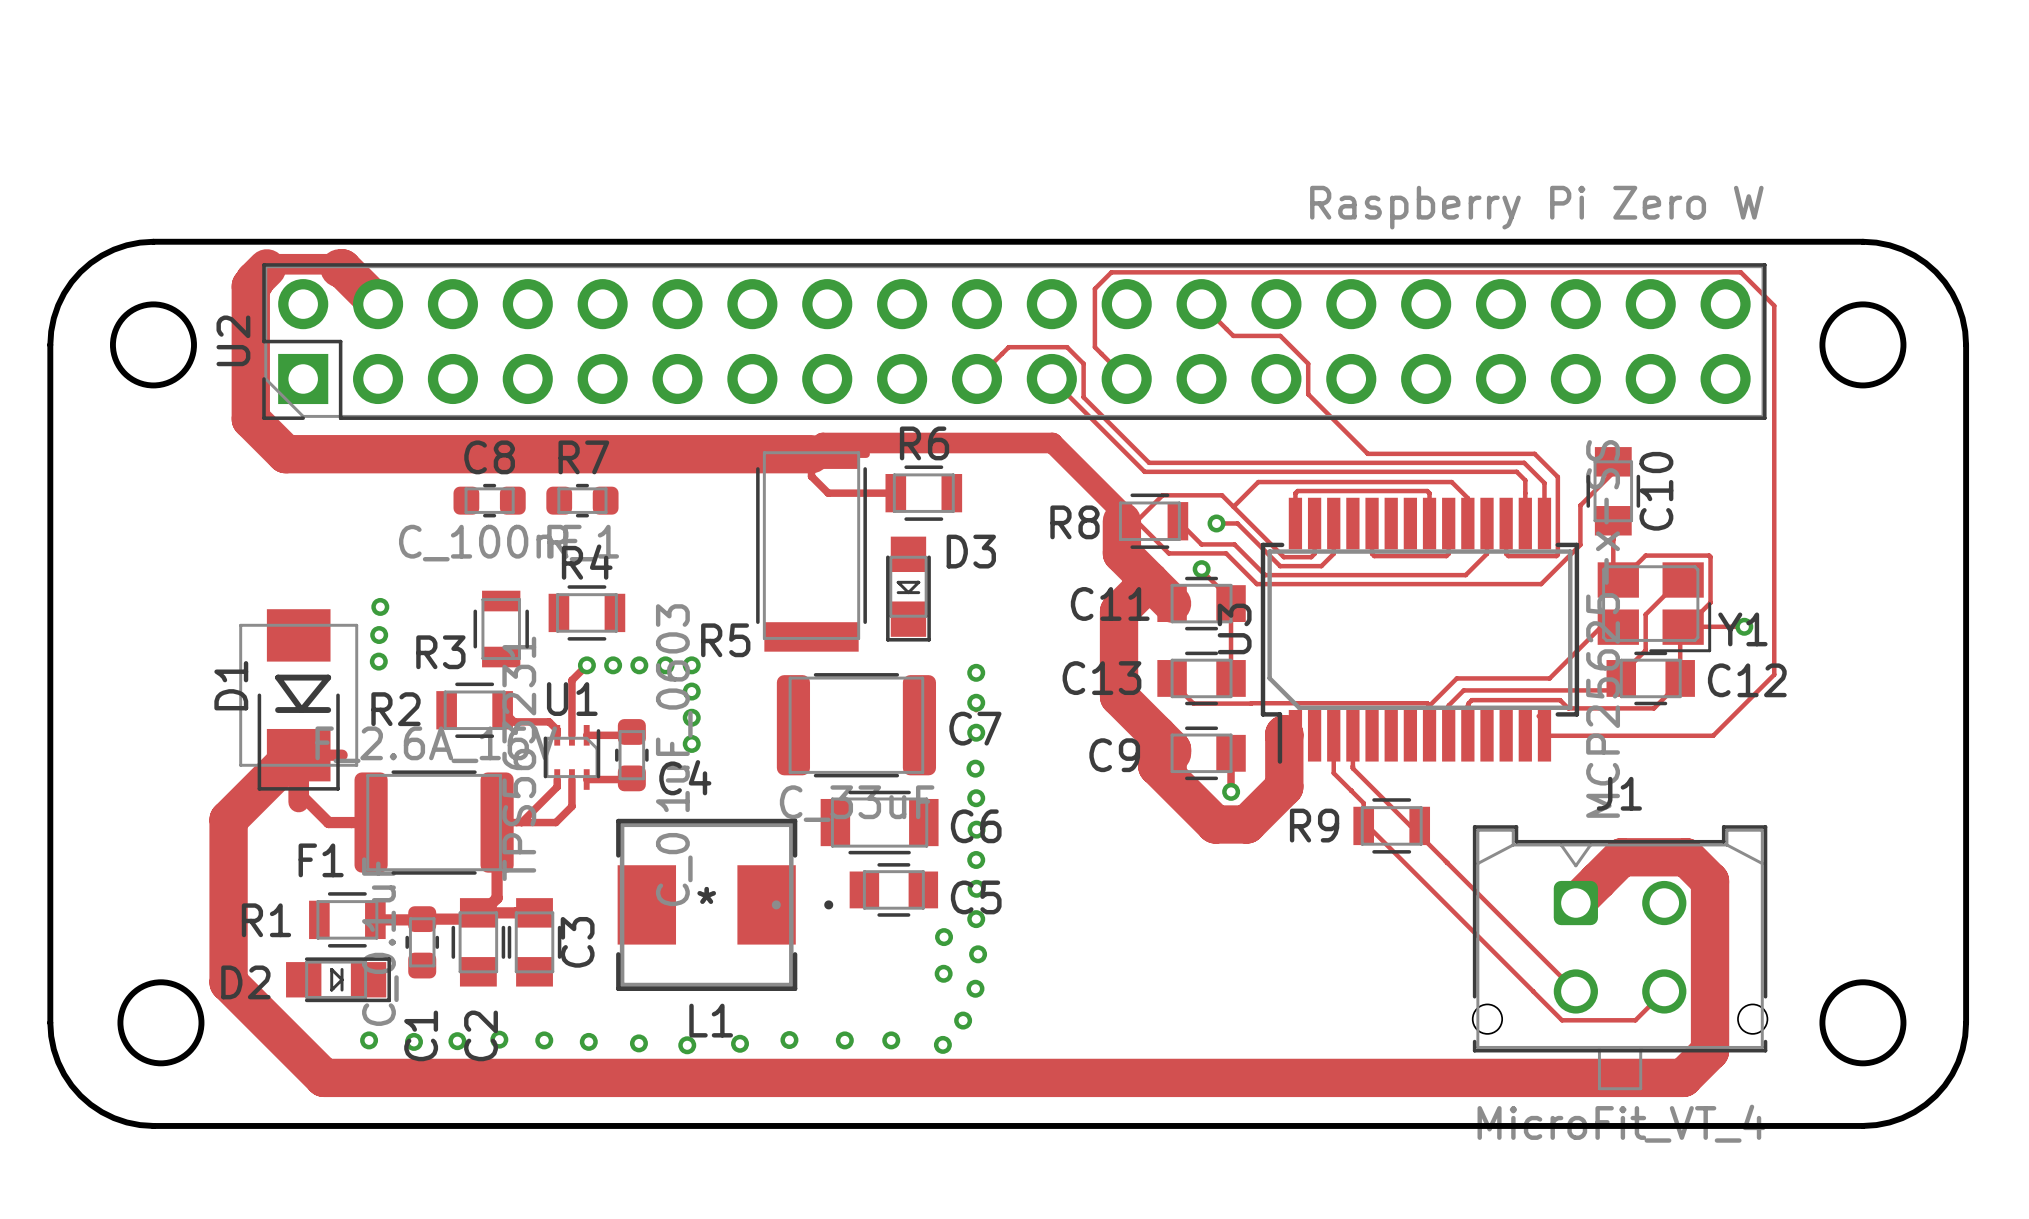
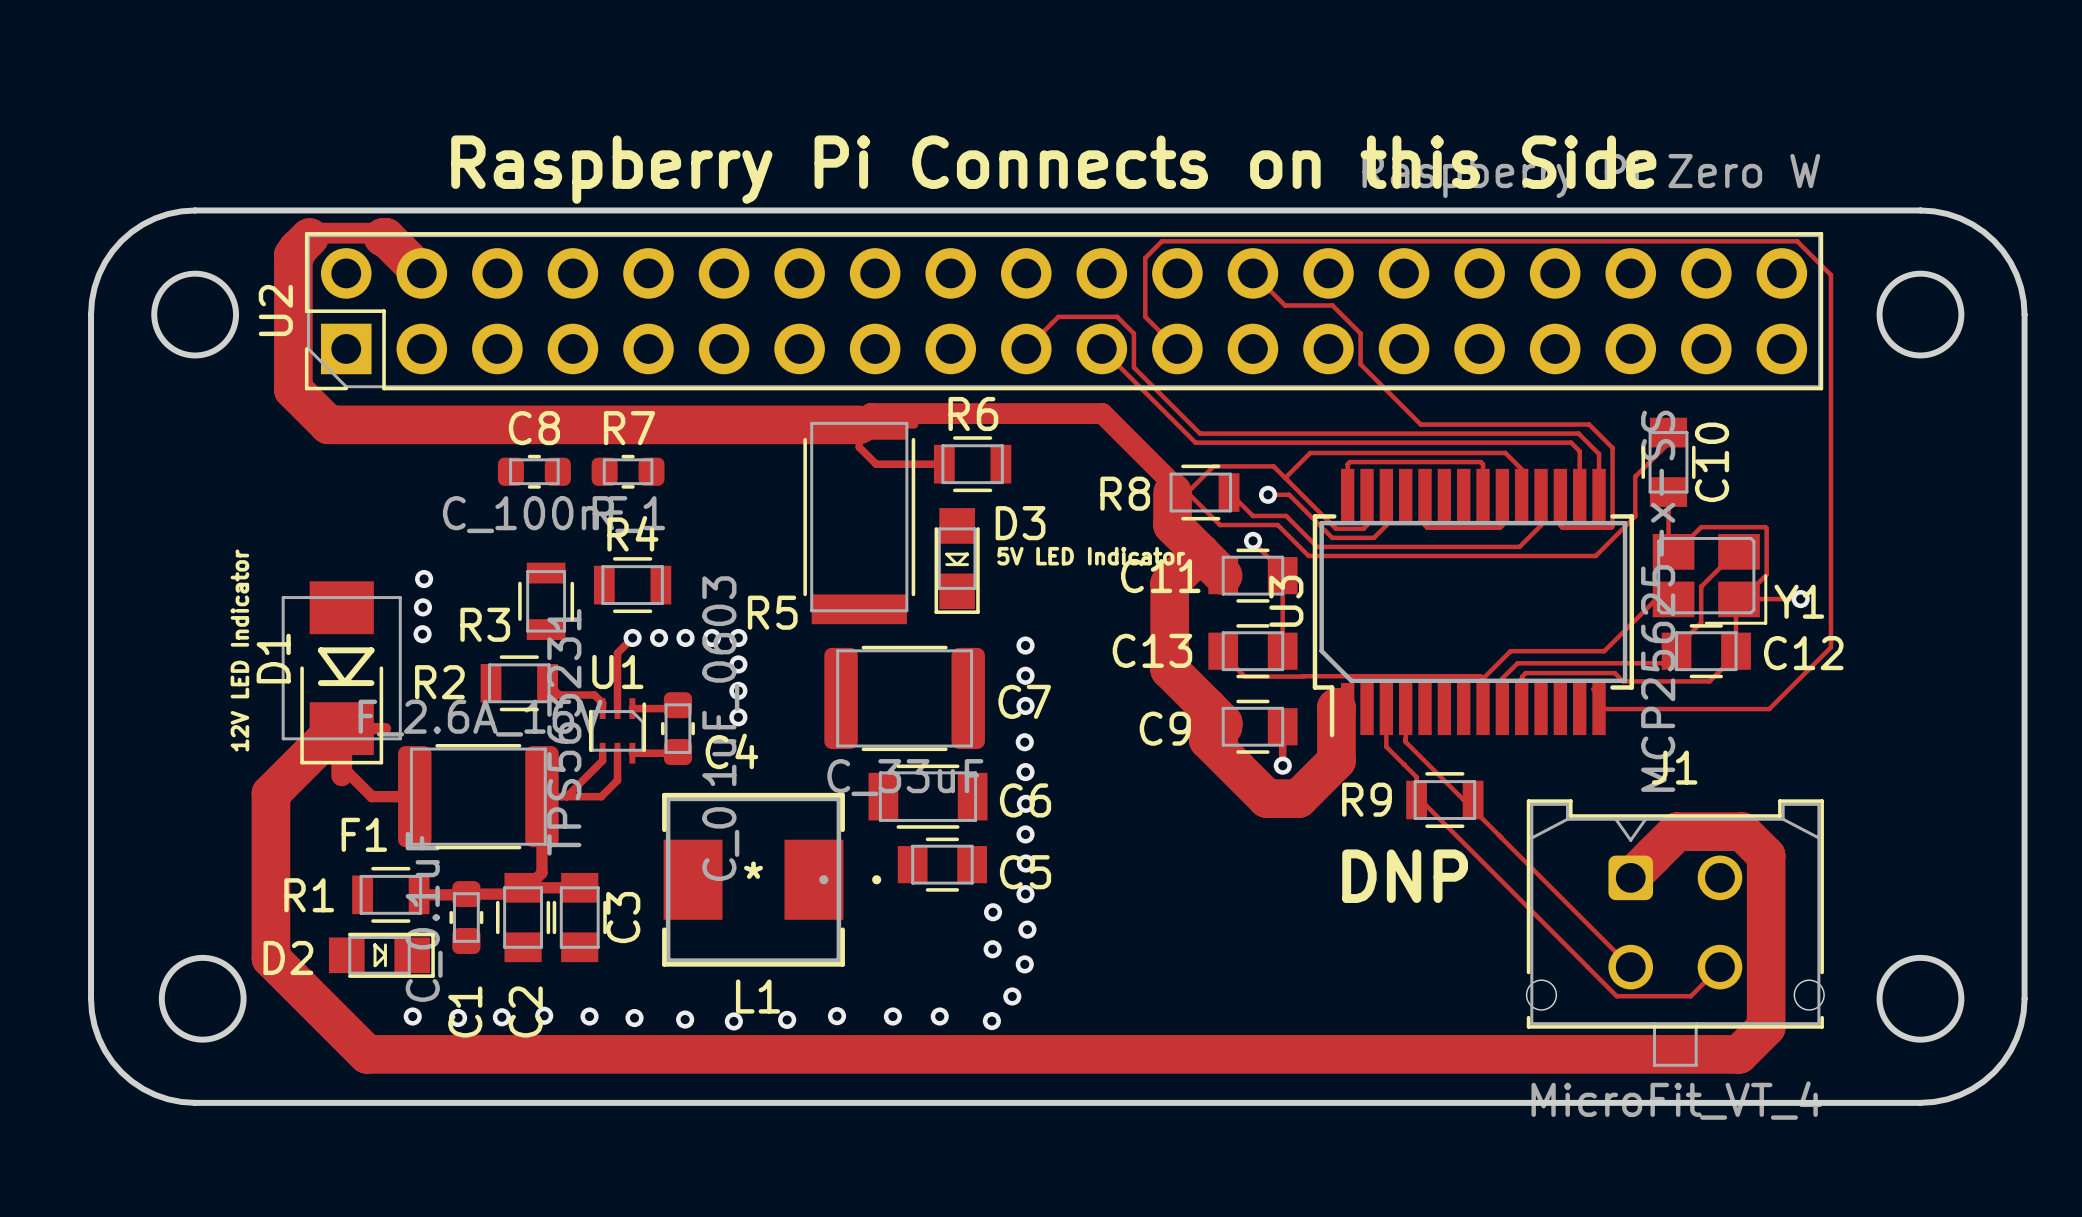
text: none -> Raspberry Pi Connects on this Side (1053, 169)
text: none -> 5V LED Indicator (1091, 556)
text: none -> 12V LED Indicator (239, 650)
text: none -> DNP (1405, 876)

